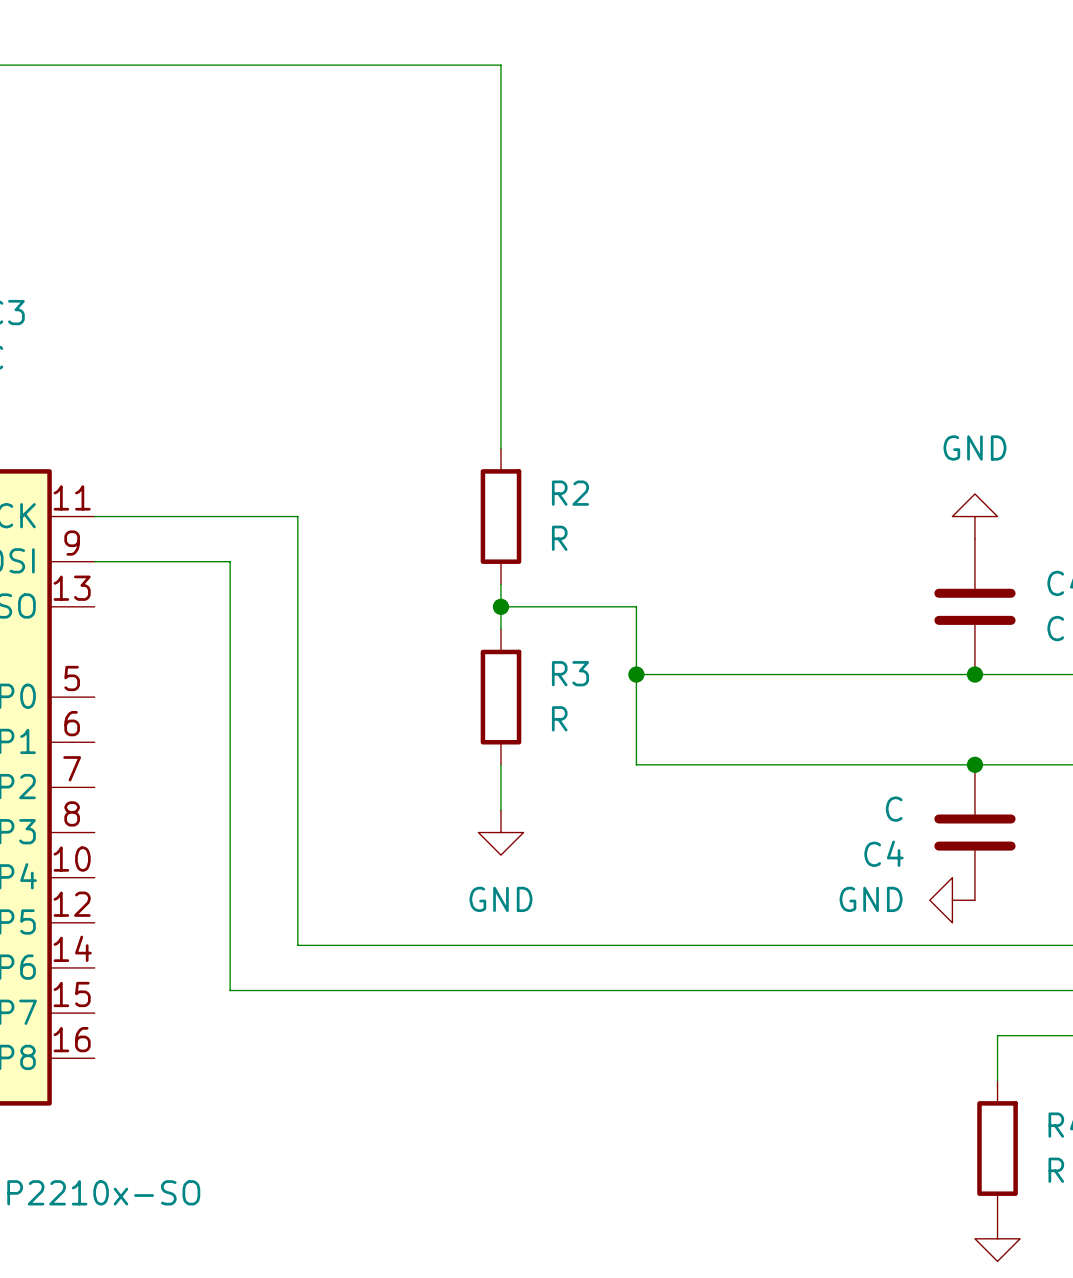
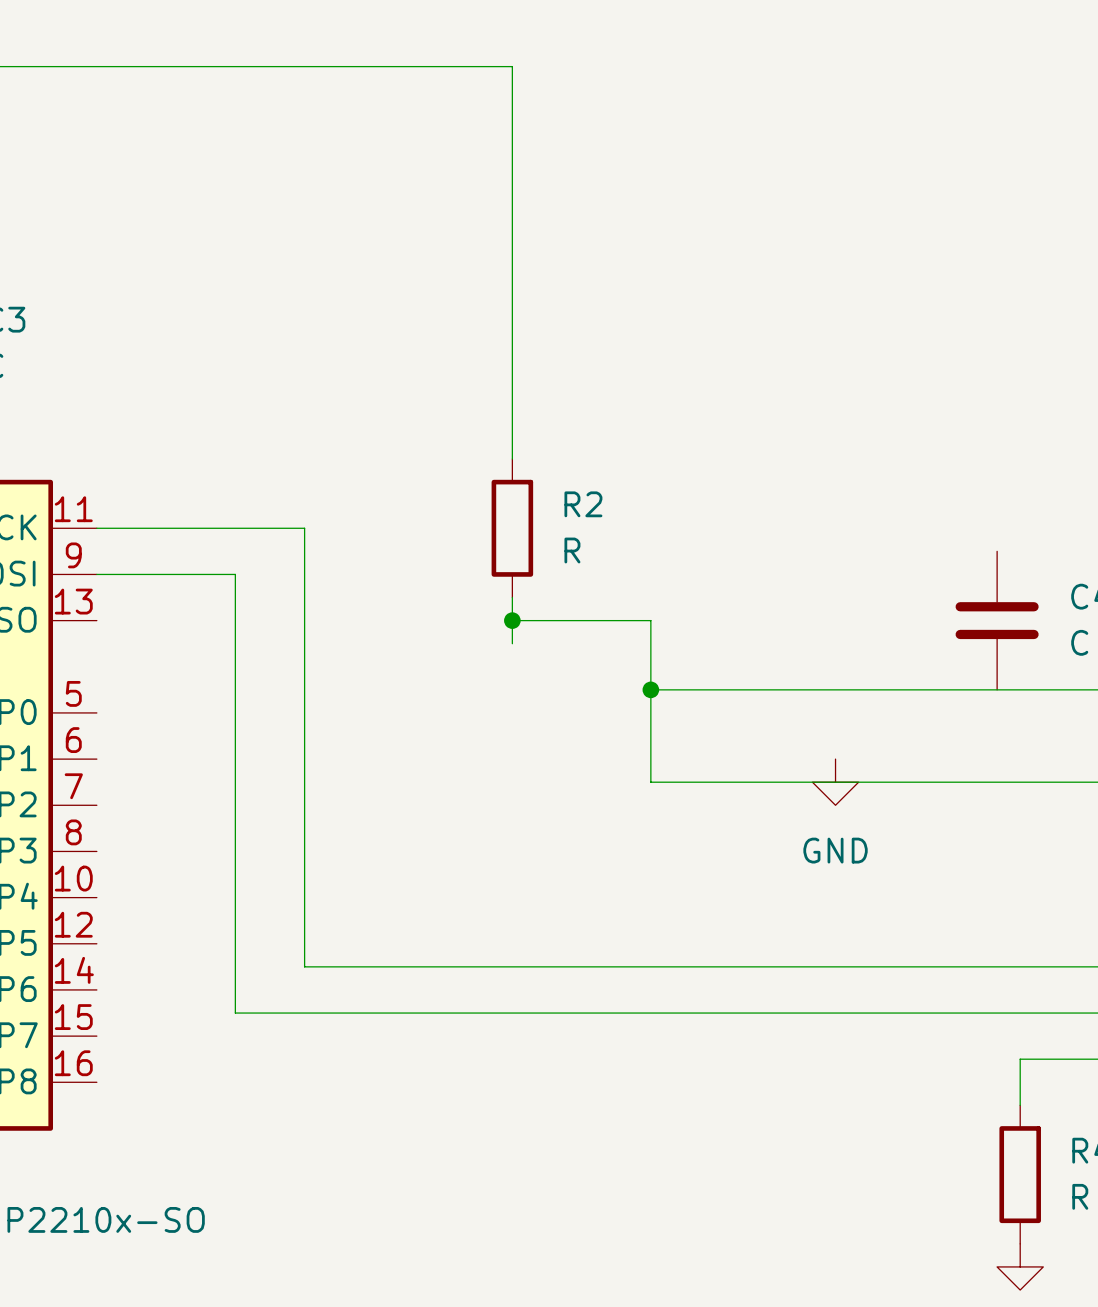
power symbol: GND (974, 516) -> none
junction: (974, 674) -> none
R3: R (500, 697) -> none
wire: (500, 764) (500, 809) -> none
power symbol: none -> GND (835, 782)
junction: (974, 764) -> none
power symbol: GND (500, 832) -> none
C4: C (974, 832) -> none
power symbol: GND (952, 900) -> none

